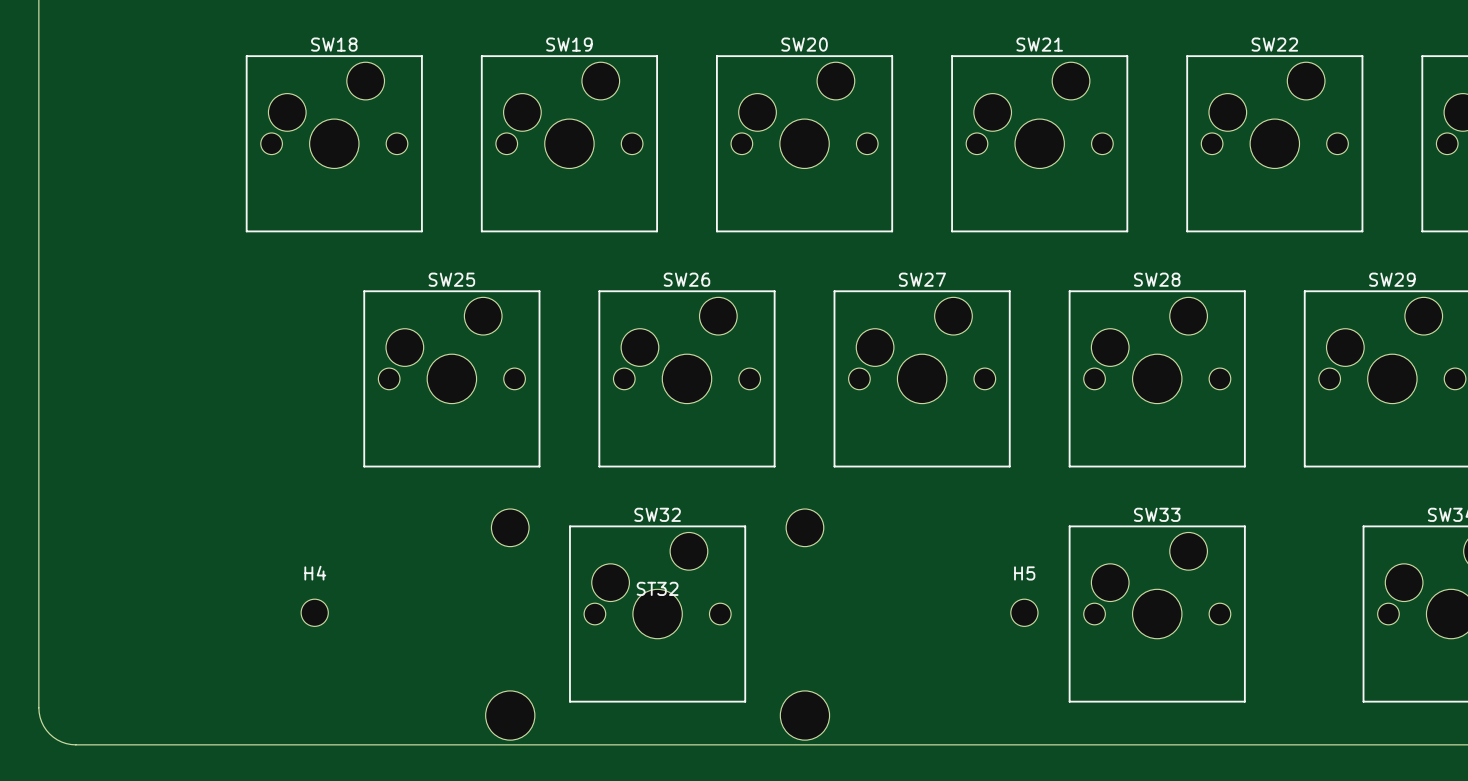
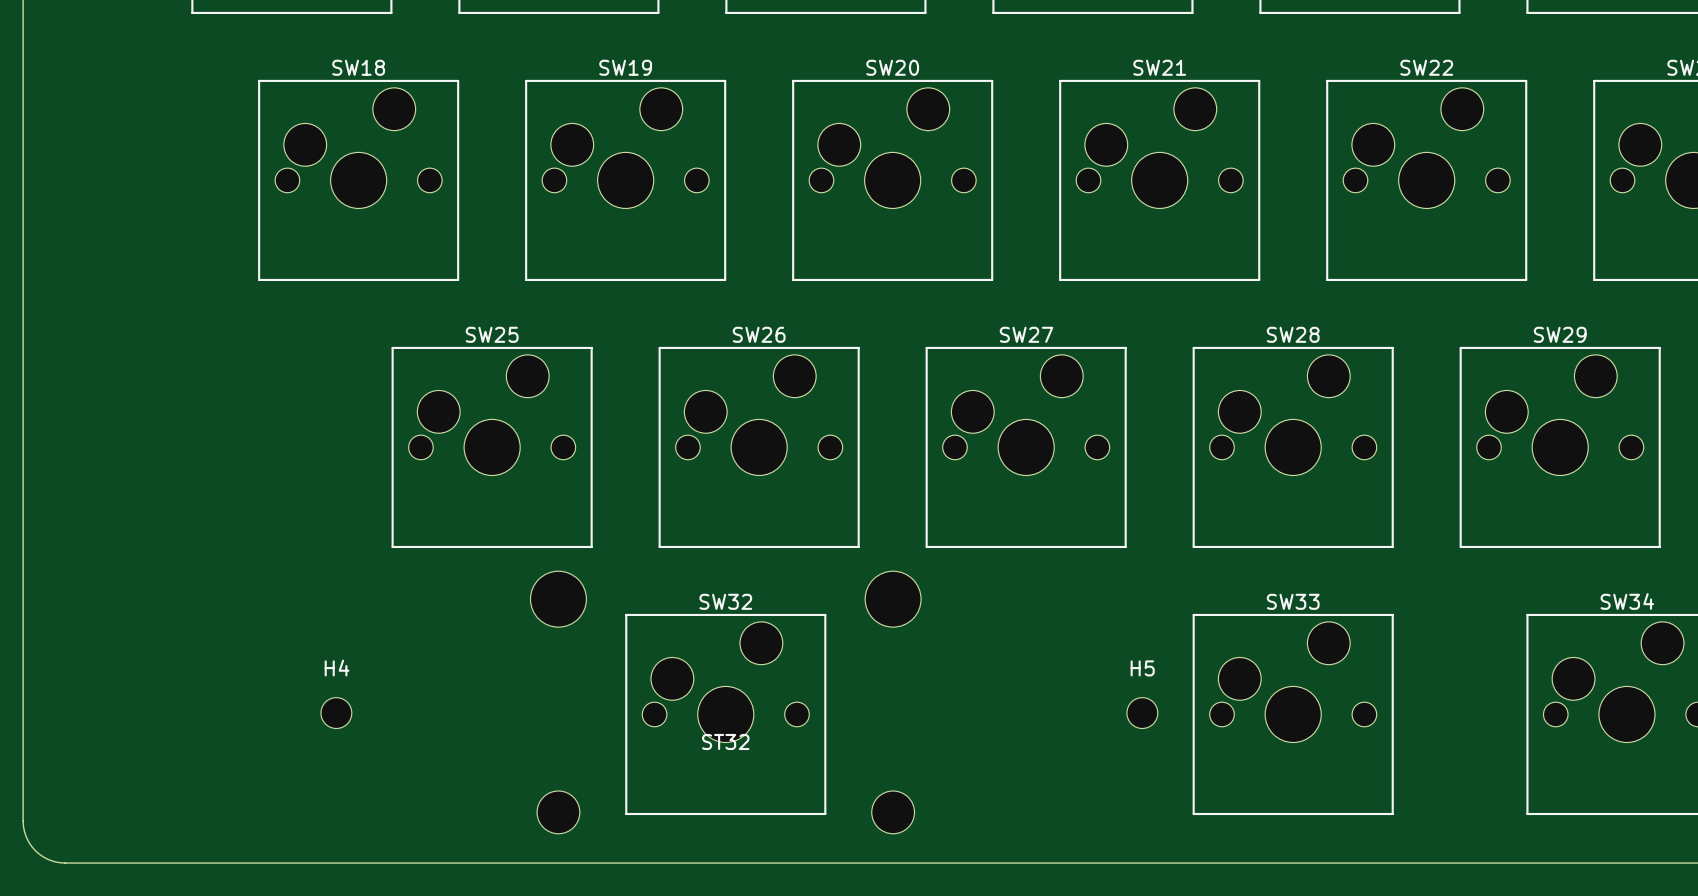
ST32 rotation: 0° (657, 624) -> 180° (725, 702)

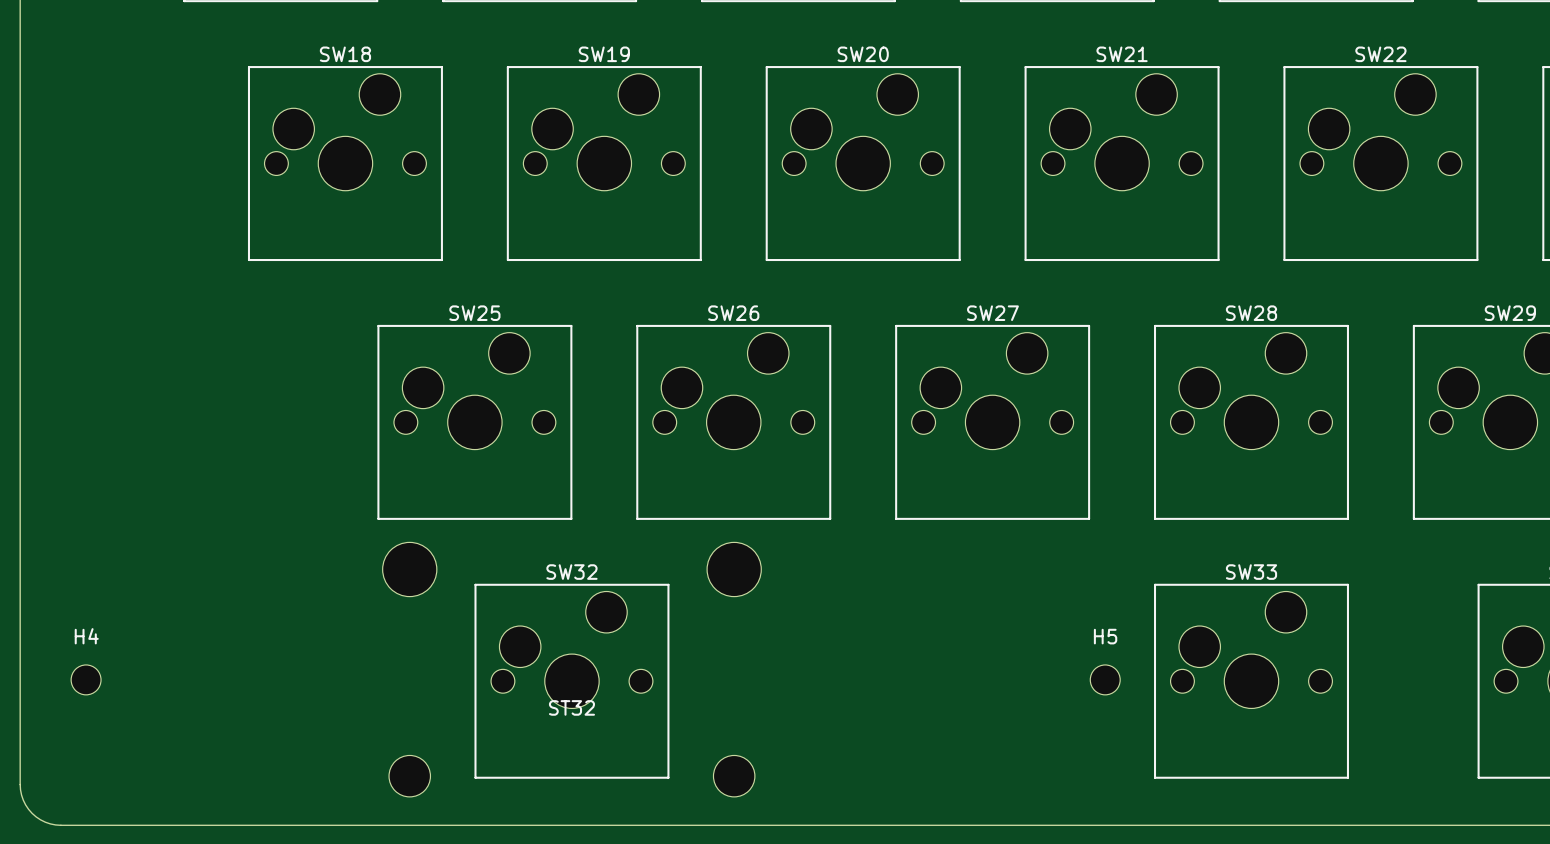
ST32 position: (725, 702) -> (571, 669)
H4 position: (336, 713) -> (86, 679)
SW32 position: (725, 714) -> (571, 681)

